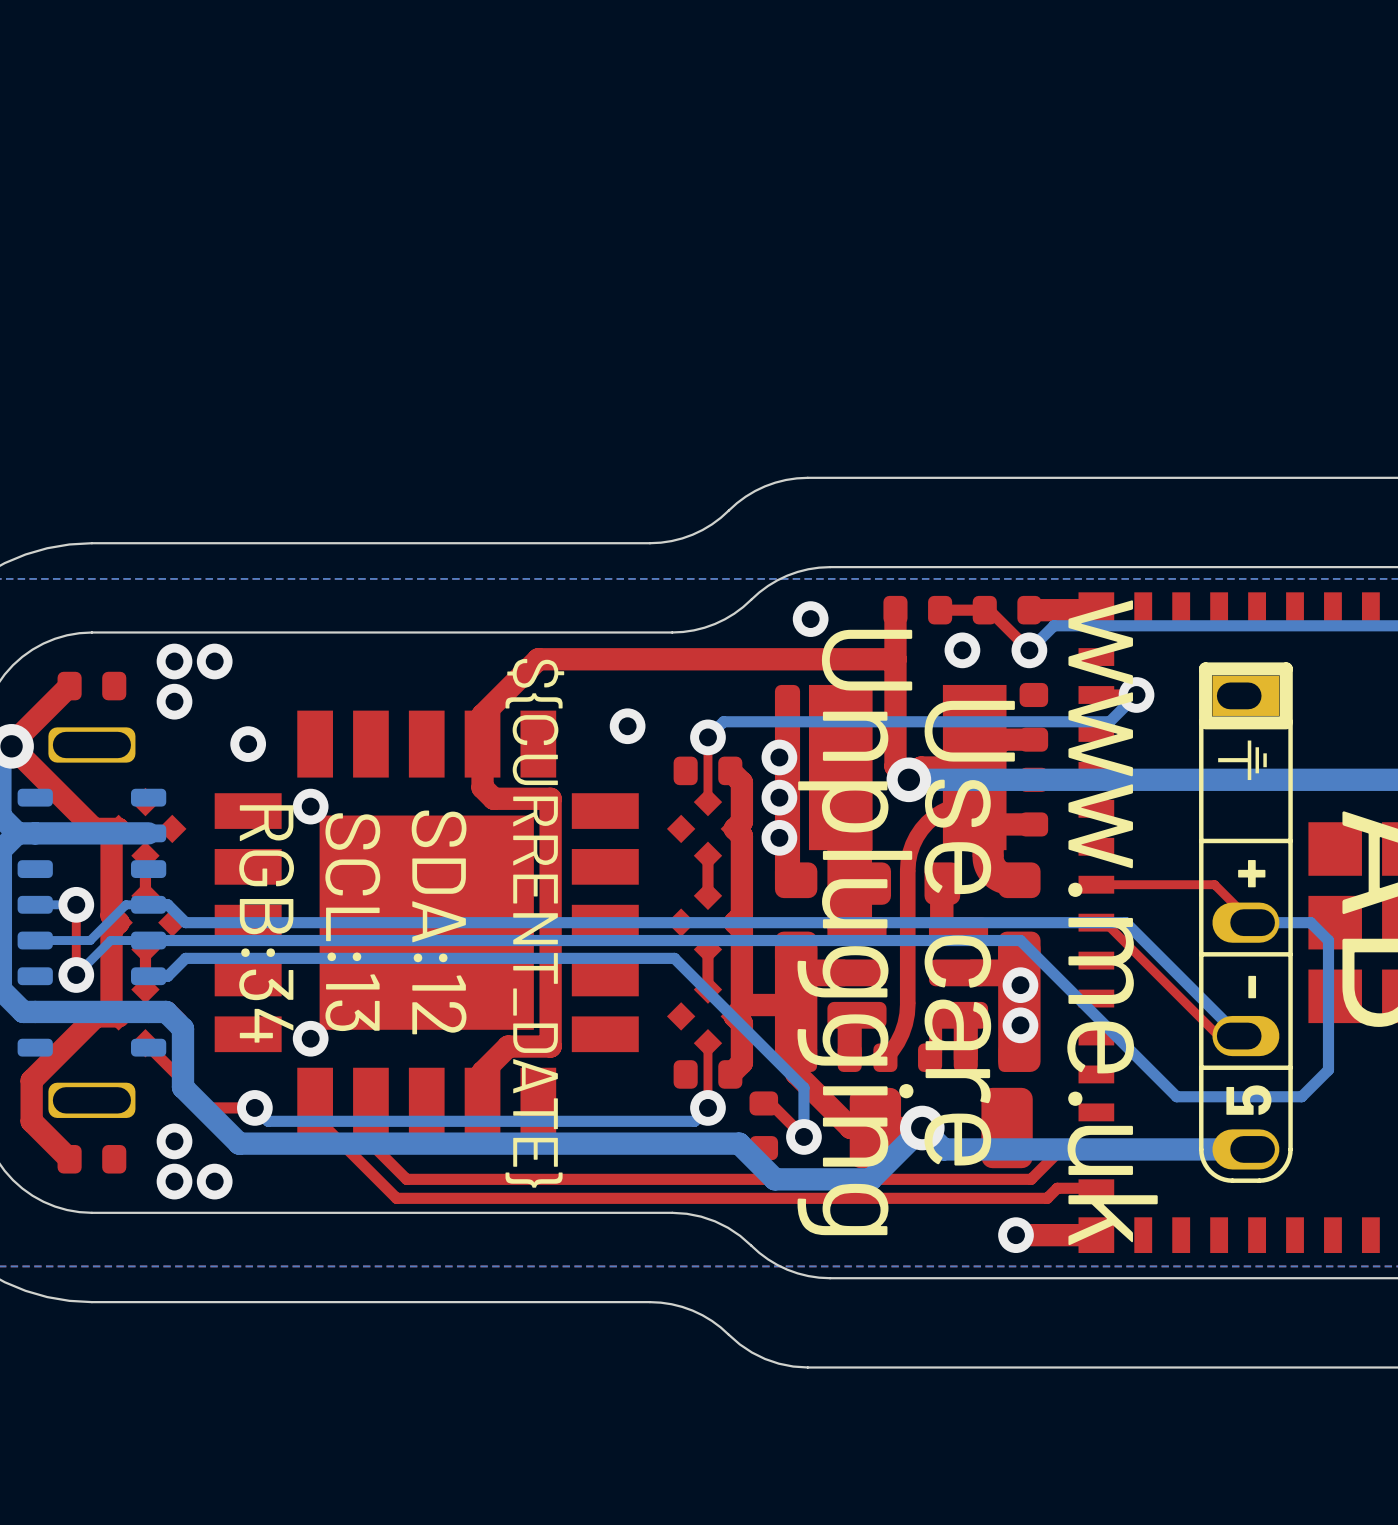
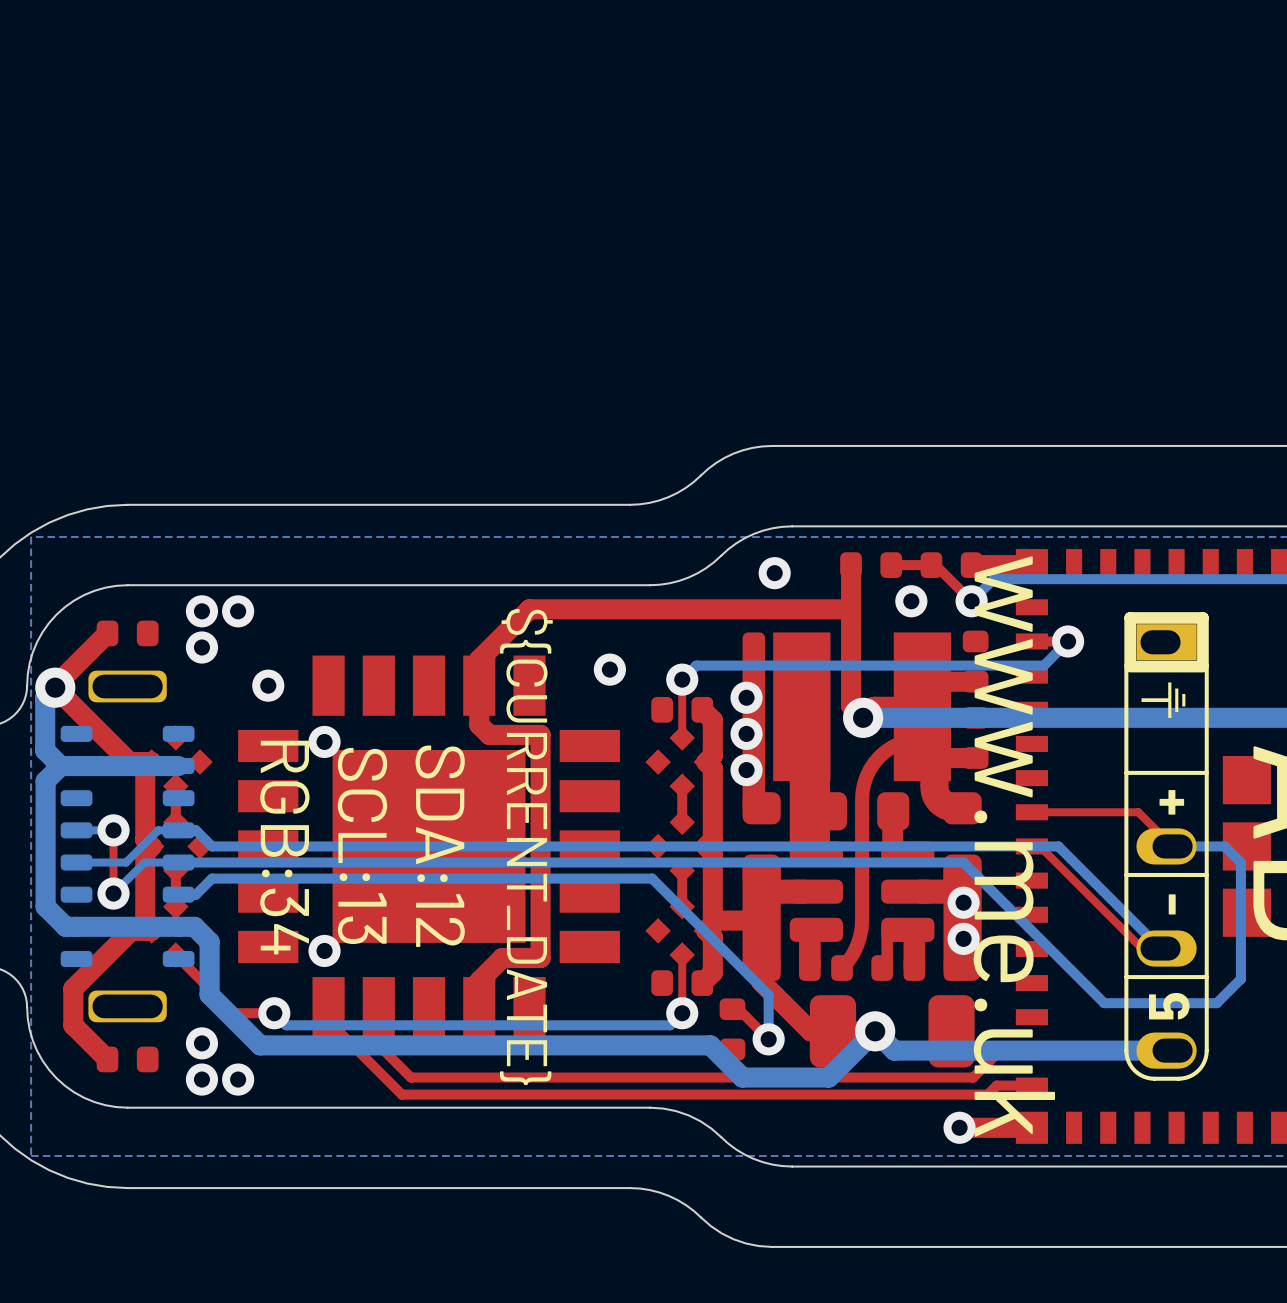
text position: www.me.uk (1112, 922) -> www.me.uk (1014, 846)
text: Unplugging (855, 932) -> none
text: Use care (969, 933) -> none

